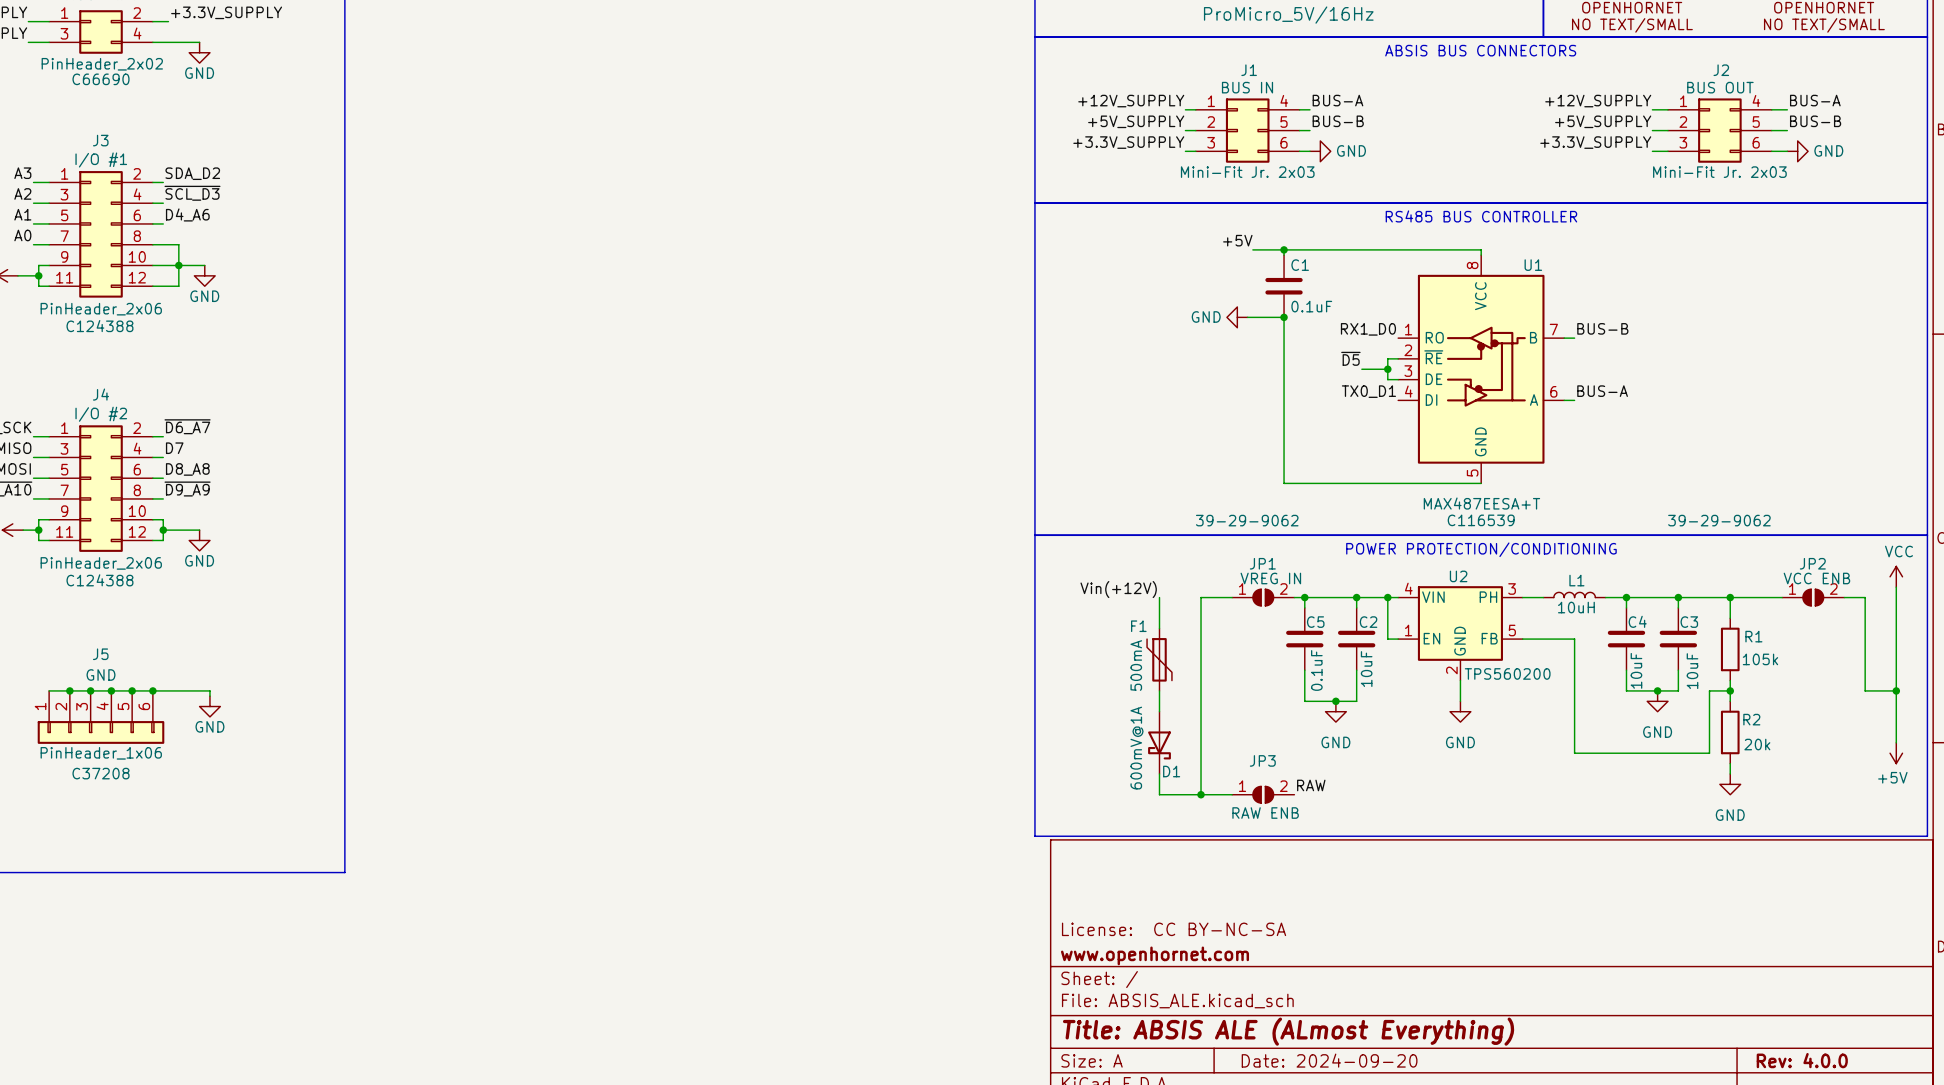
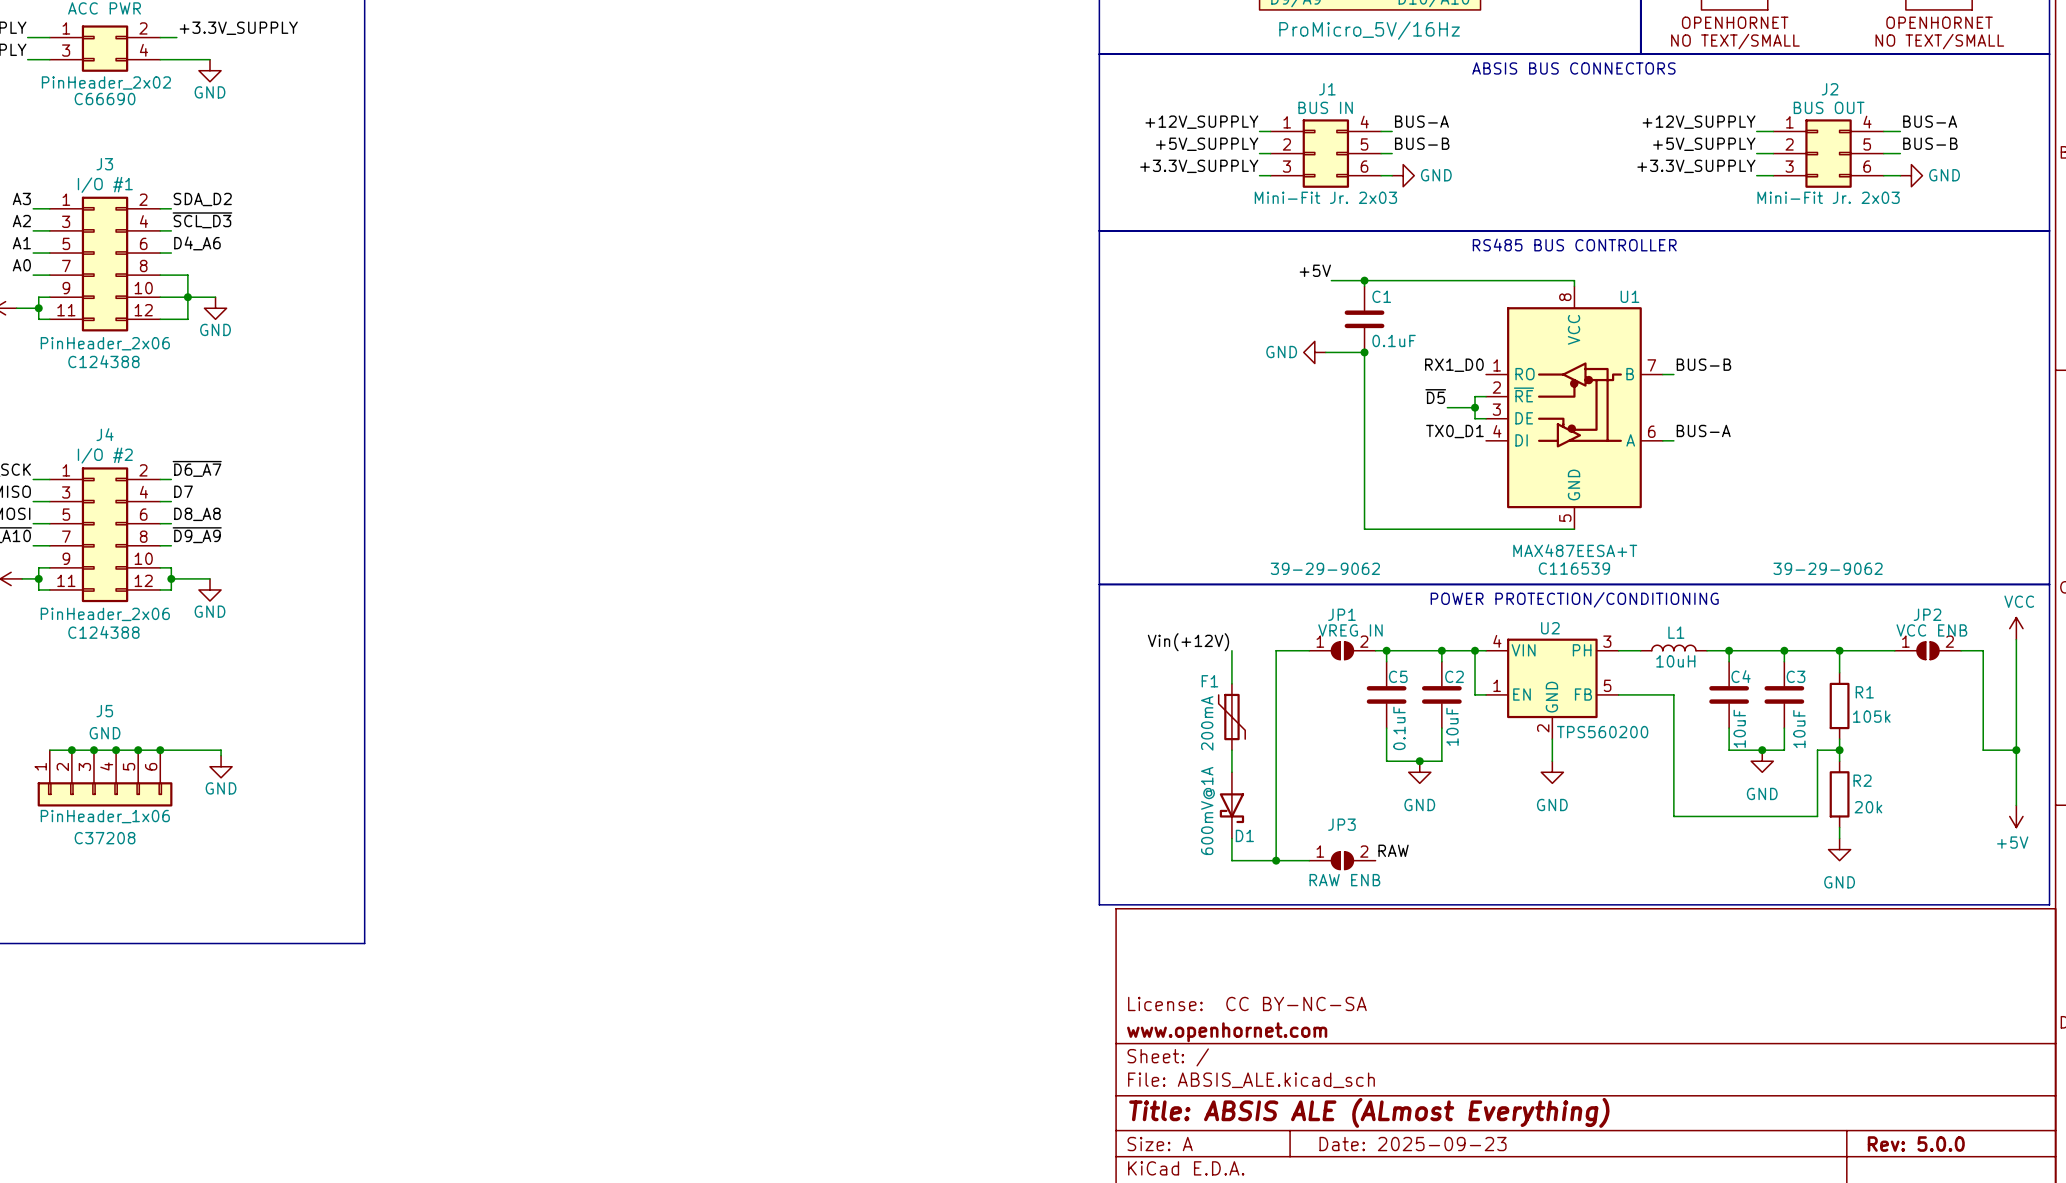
F1 value: 500mA (1136, 665) -> 200mA (1207, 723)
title block: Date: 2024-09-20 (1329, 1060) -> Date: 2025-09-23 (1413, 1144)
title block: Rev: 4.0.0 (1802, 1060) -> Rev: 5.0.0 (1916, 1144)

